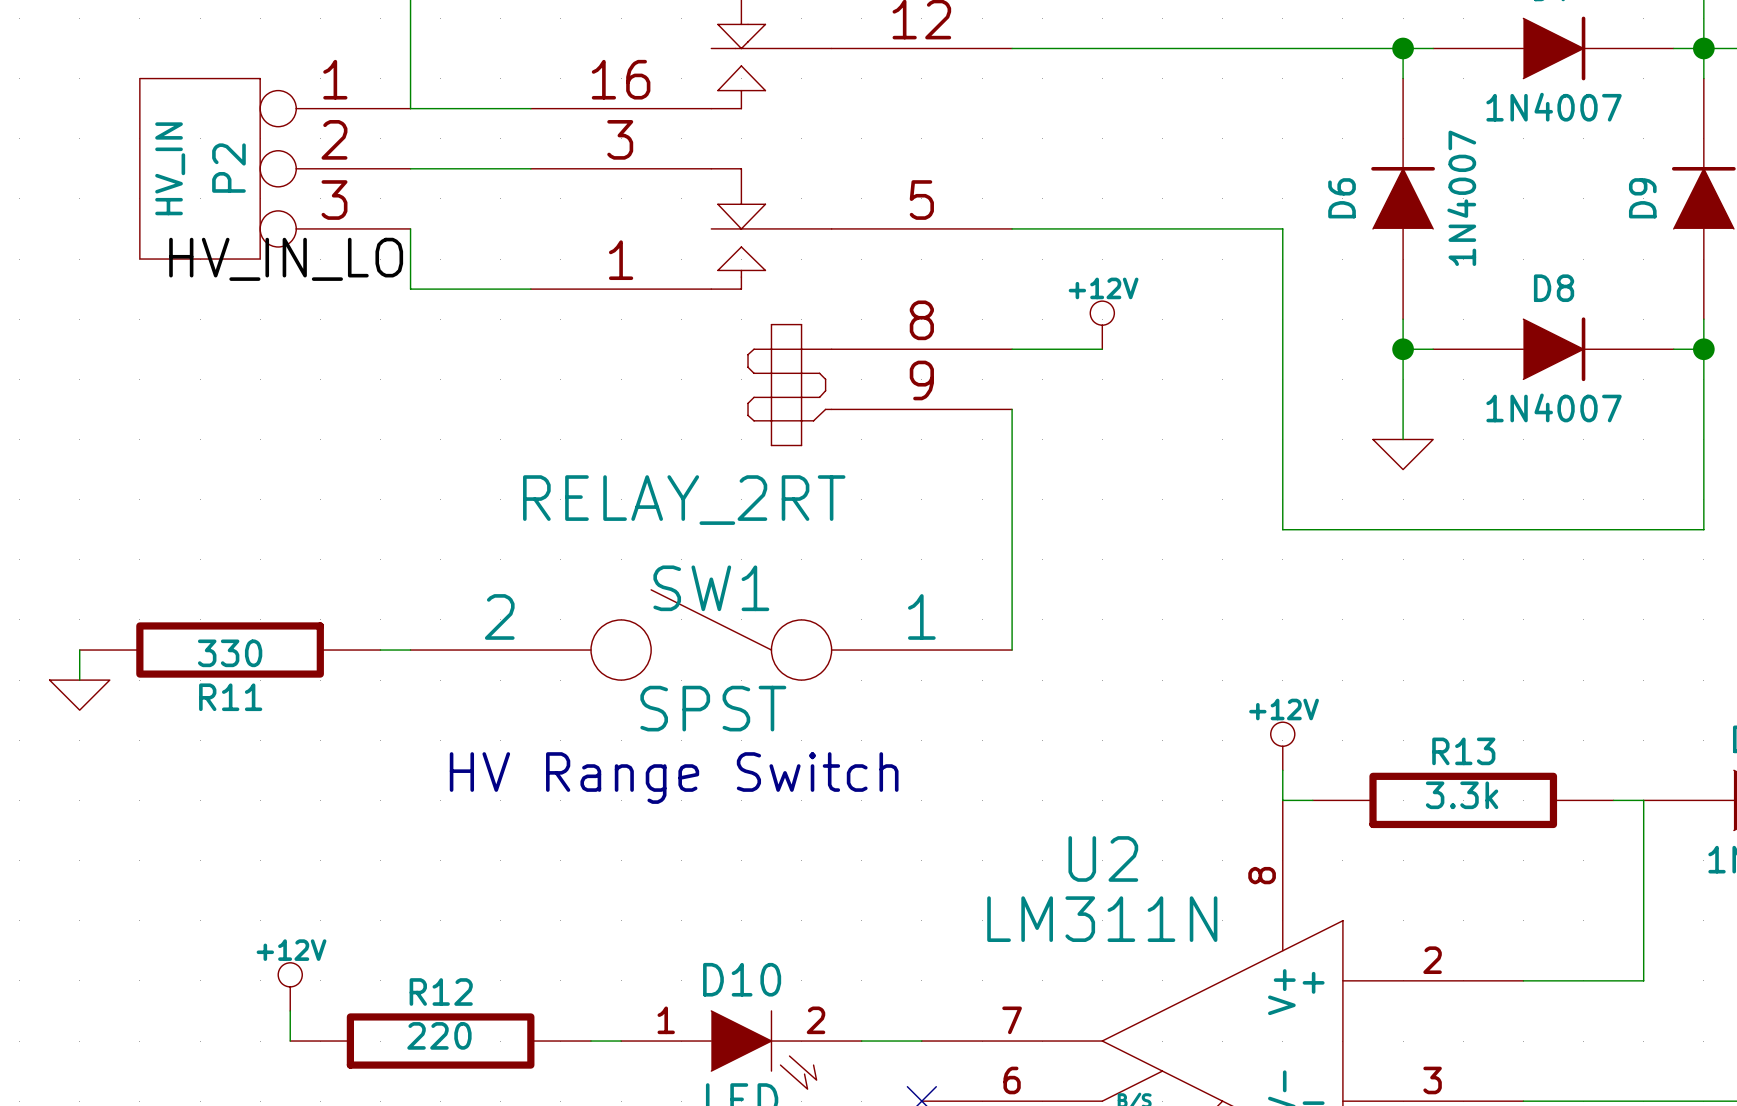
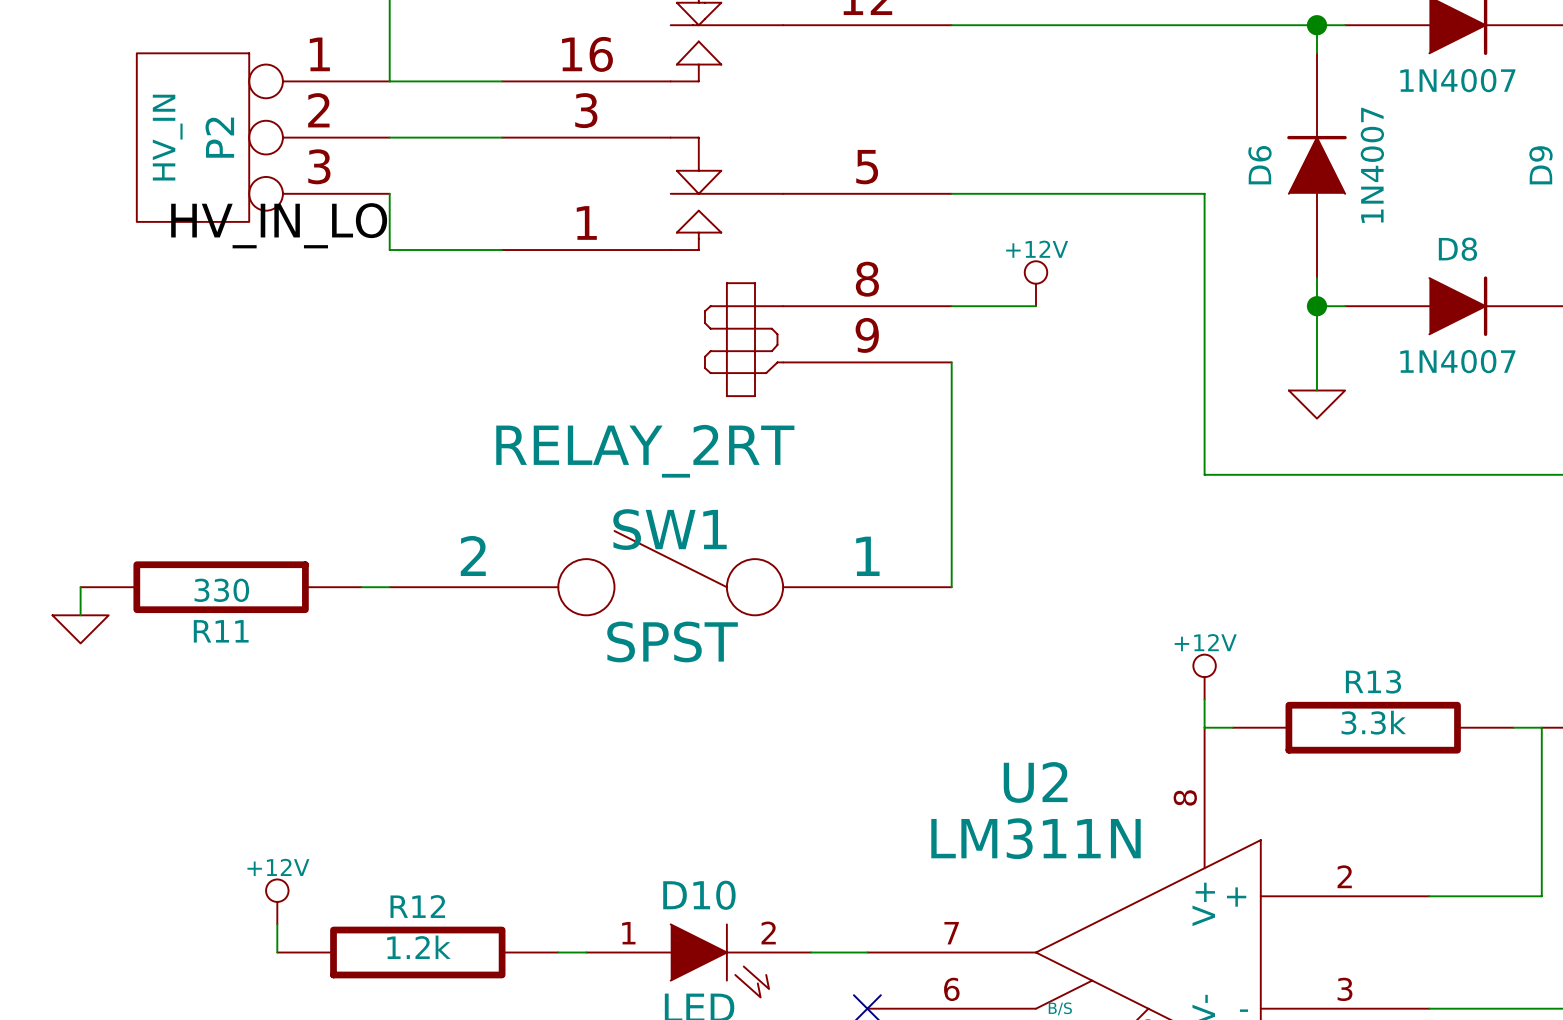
text: HV Range Switch (674, 778) -> none
R12 value: 220 (439, 1035) -> 1.2k (418, 947)

